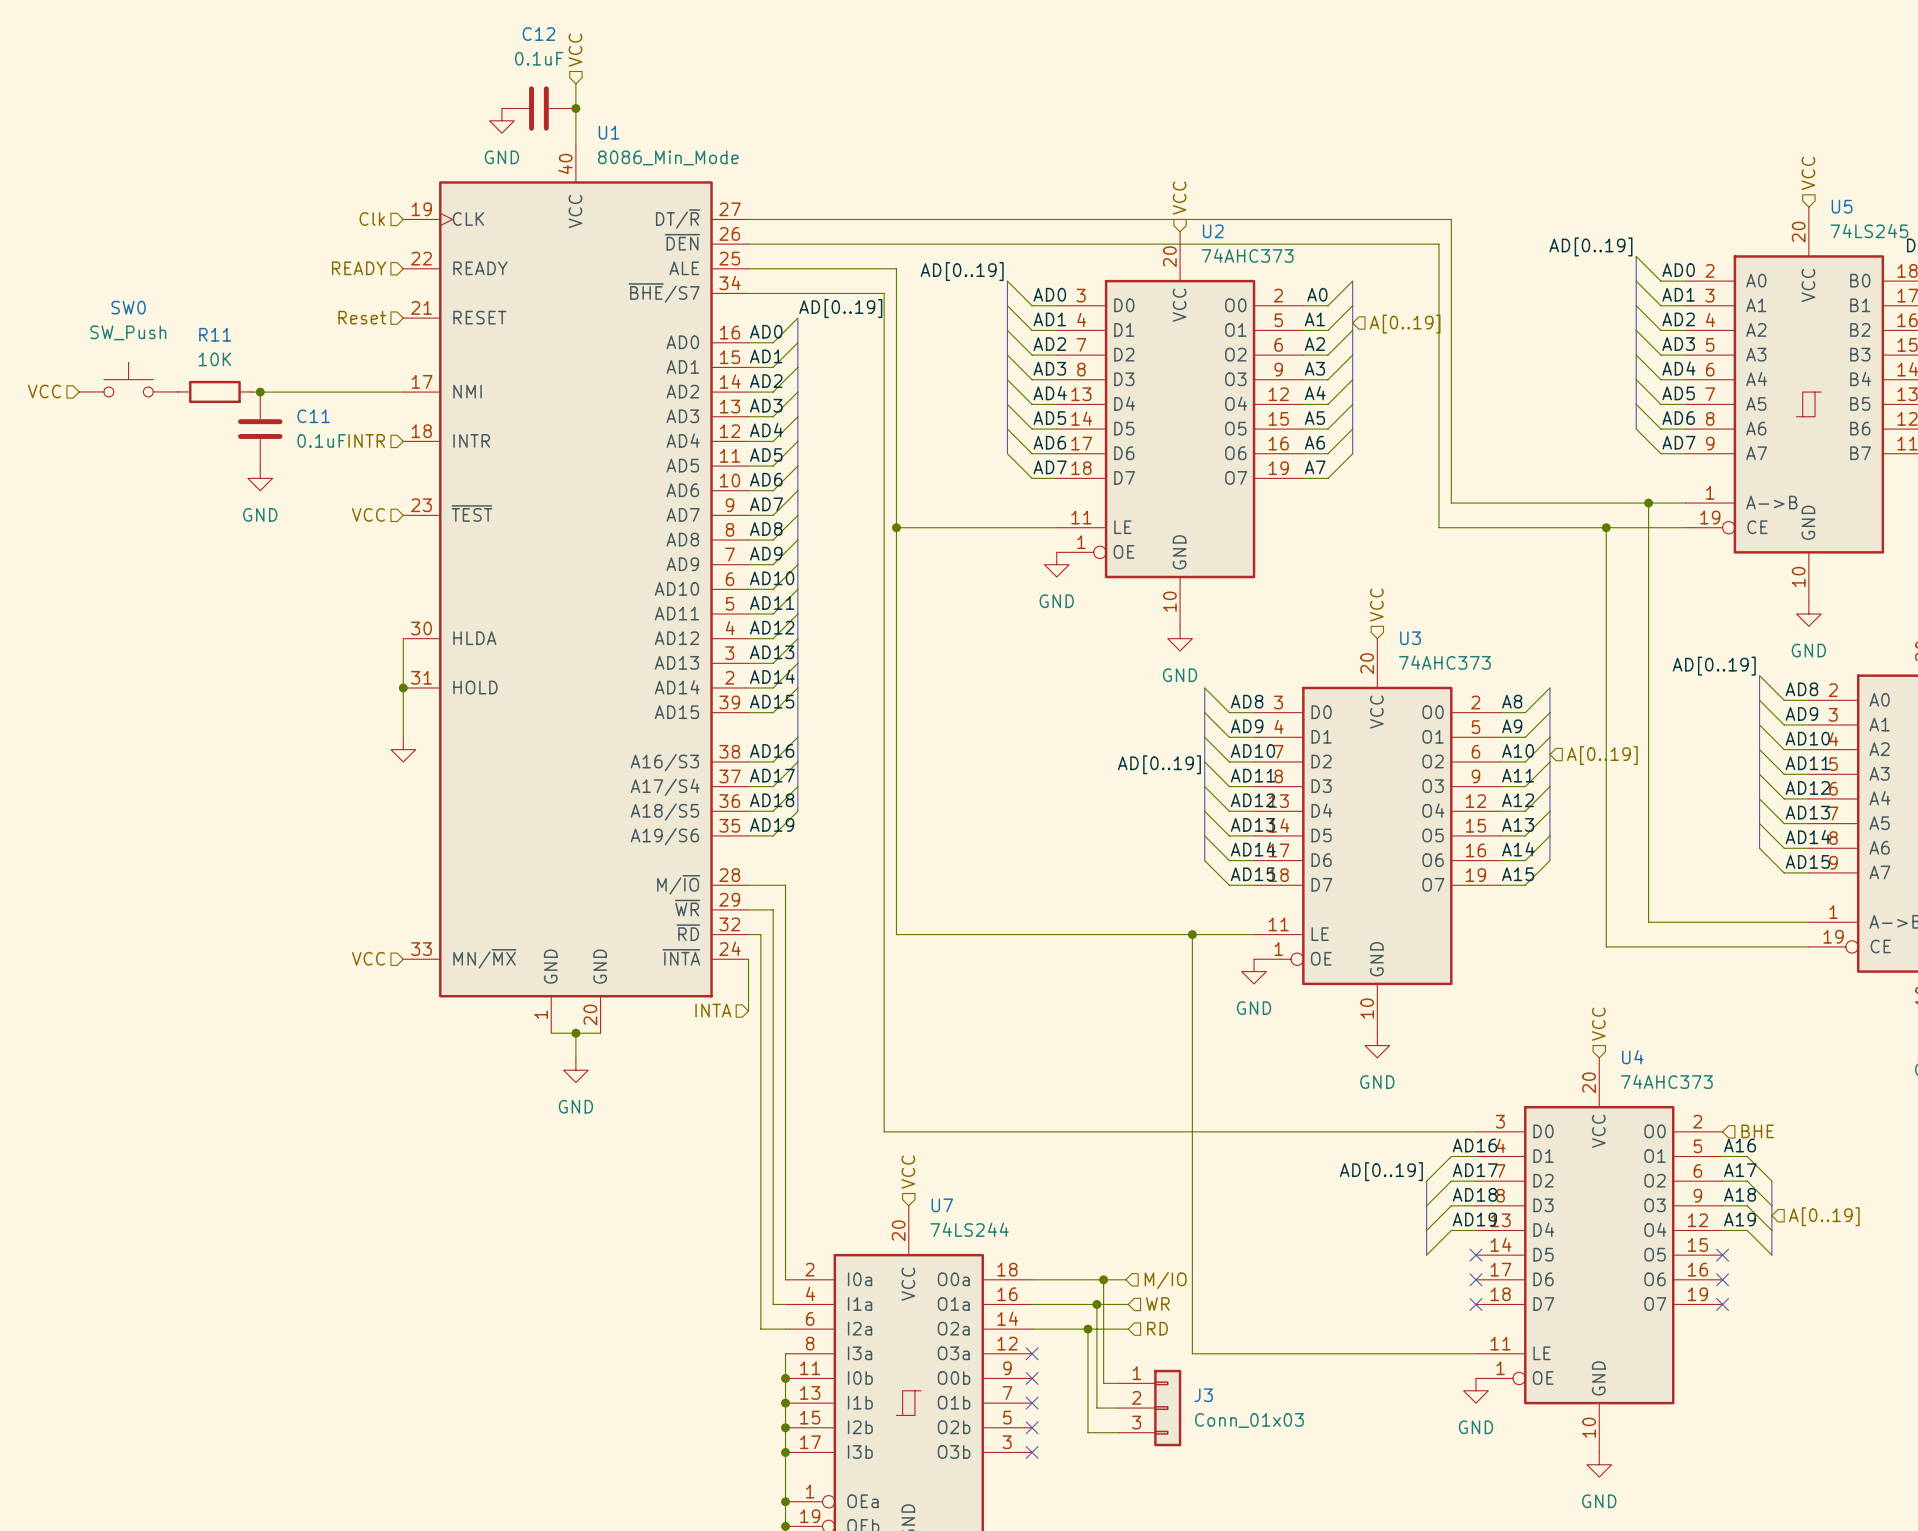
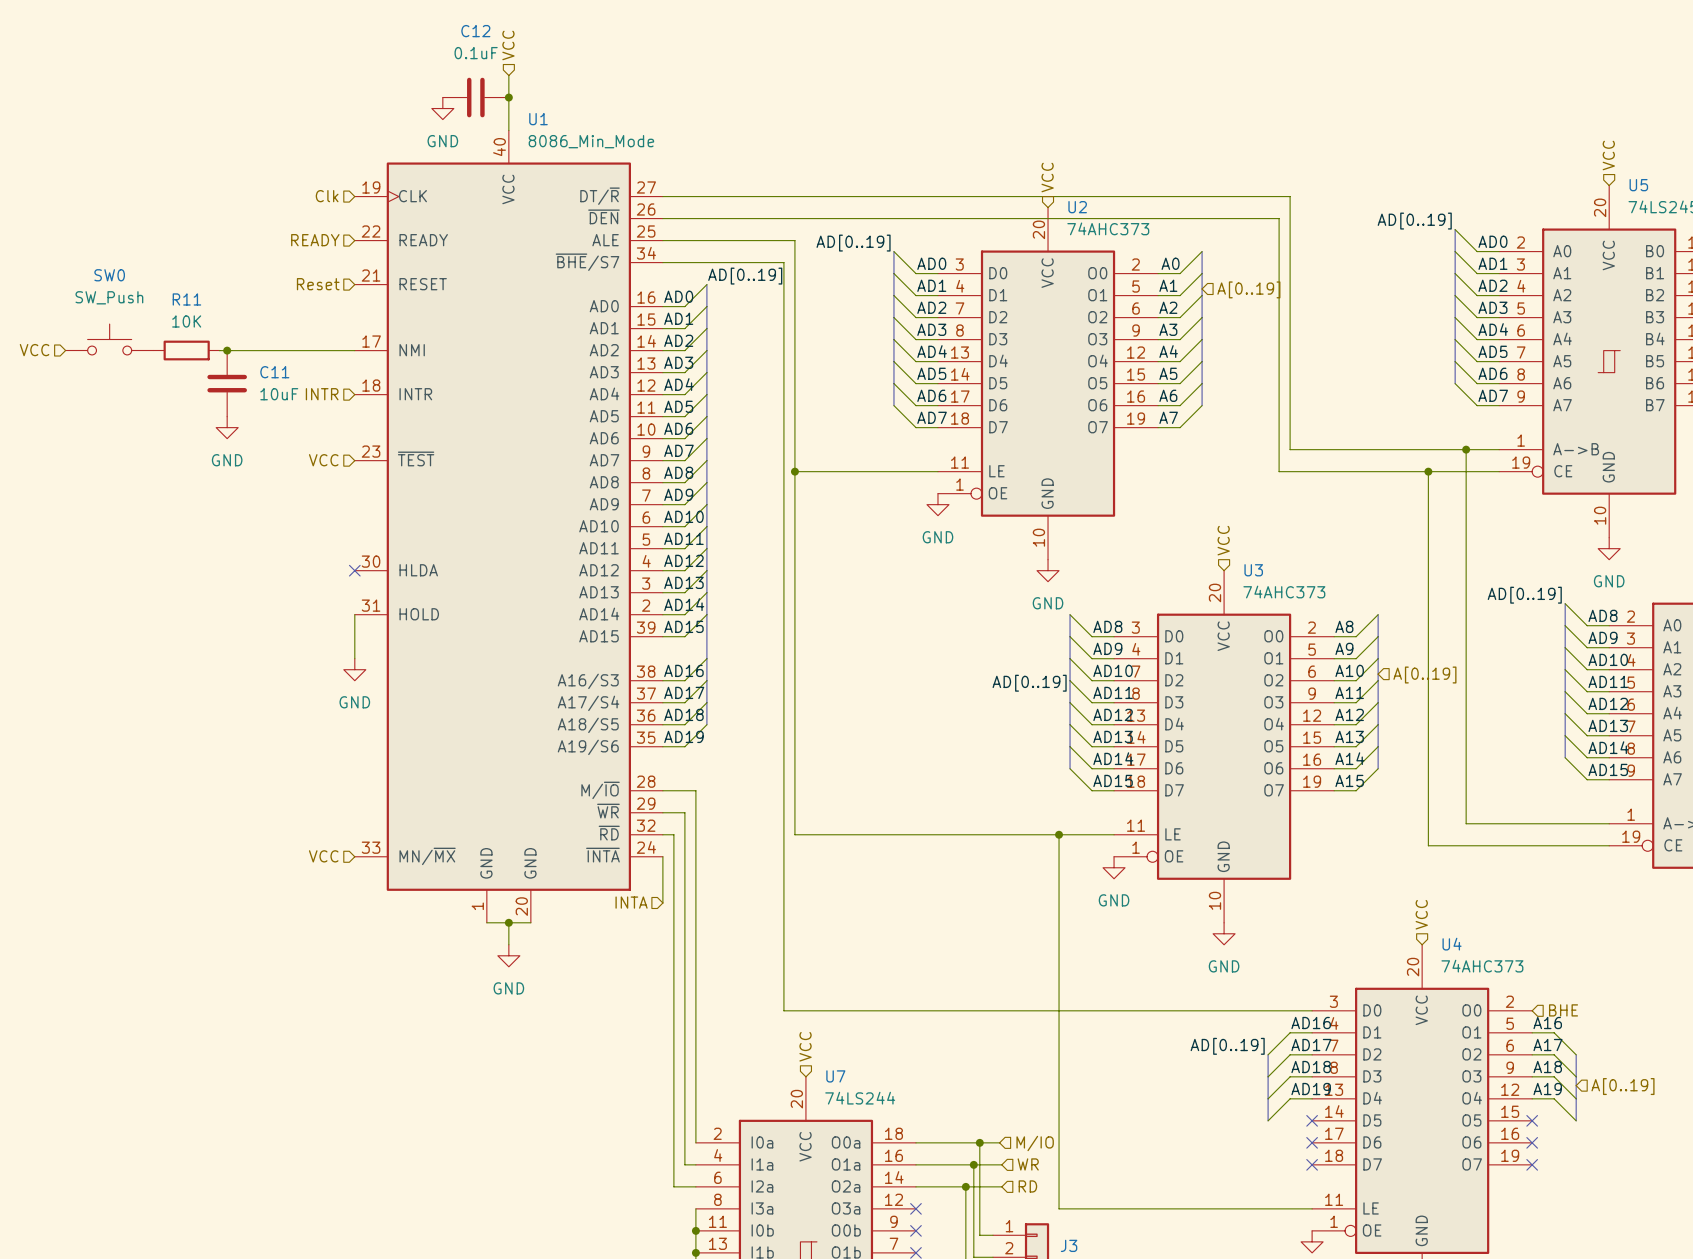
C11 value: 0.1uF (321, 440) -> 10uF (279, 394)
wire: (403, 638) (403, 687) -> none
no-connect mark: none -> (354, 570)
junction: (403, 687) -> none
power symbol text: none -> GND (354, 702)

